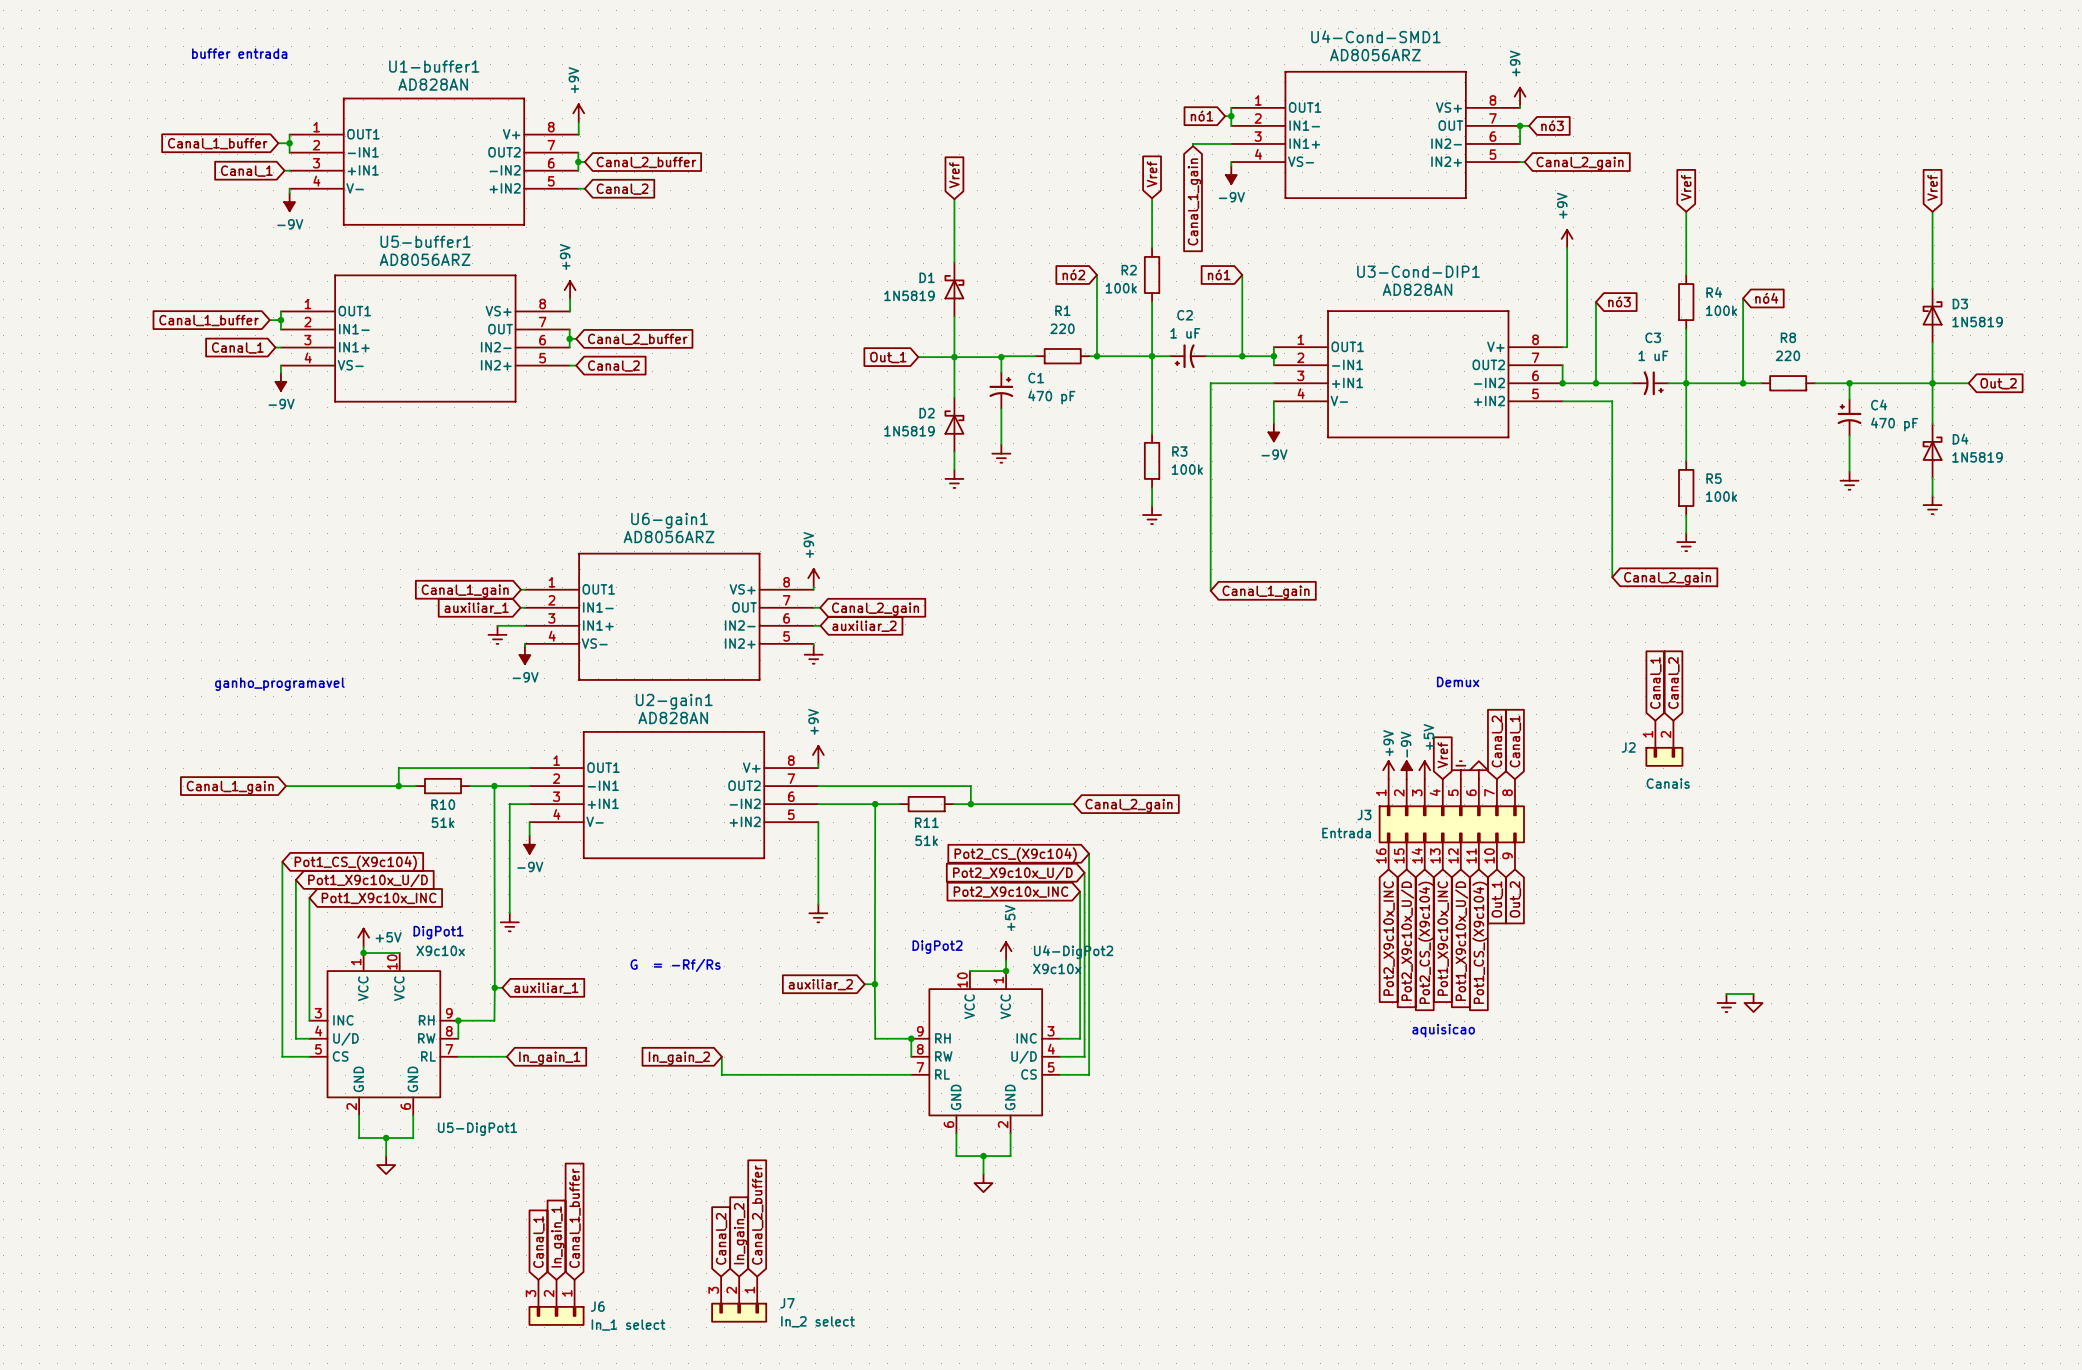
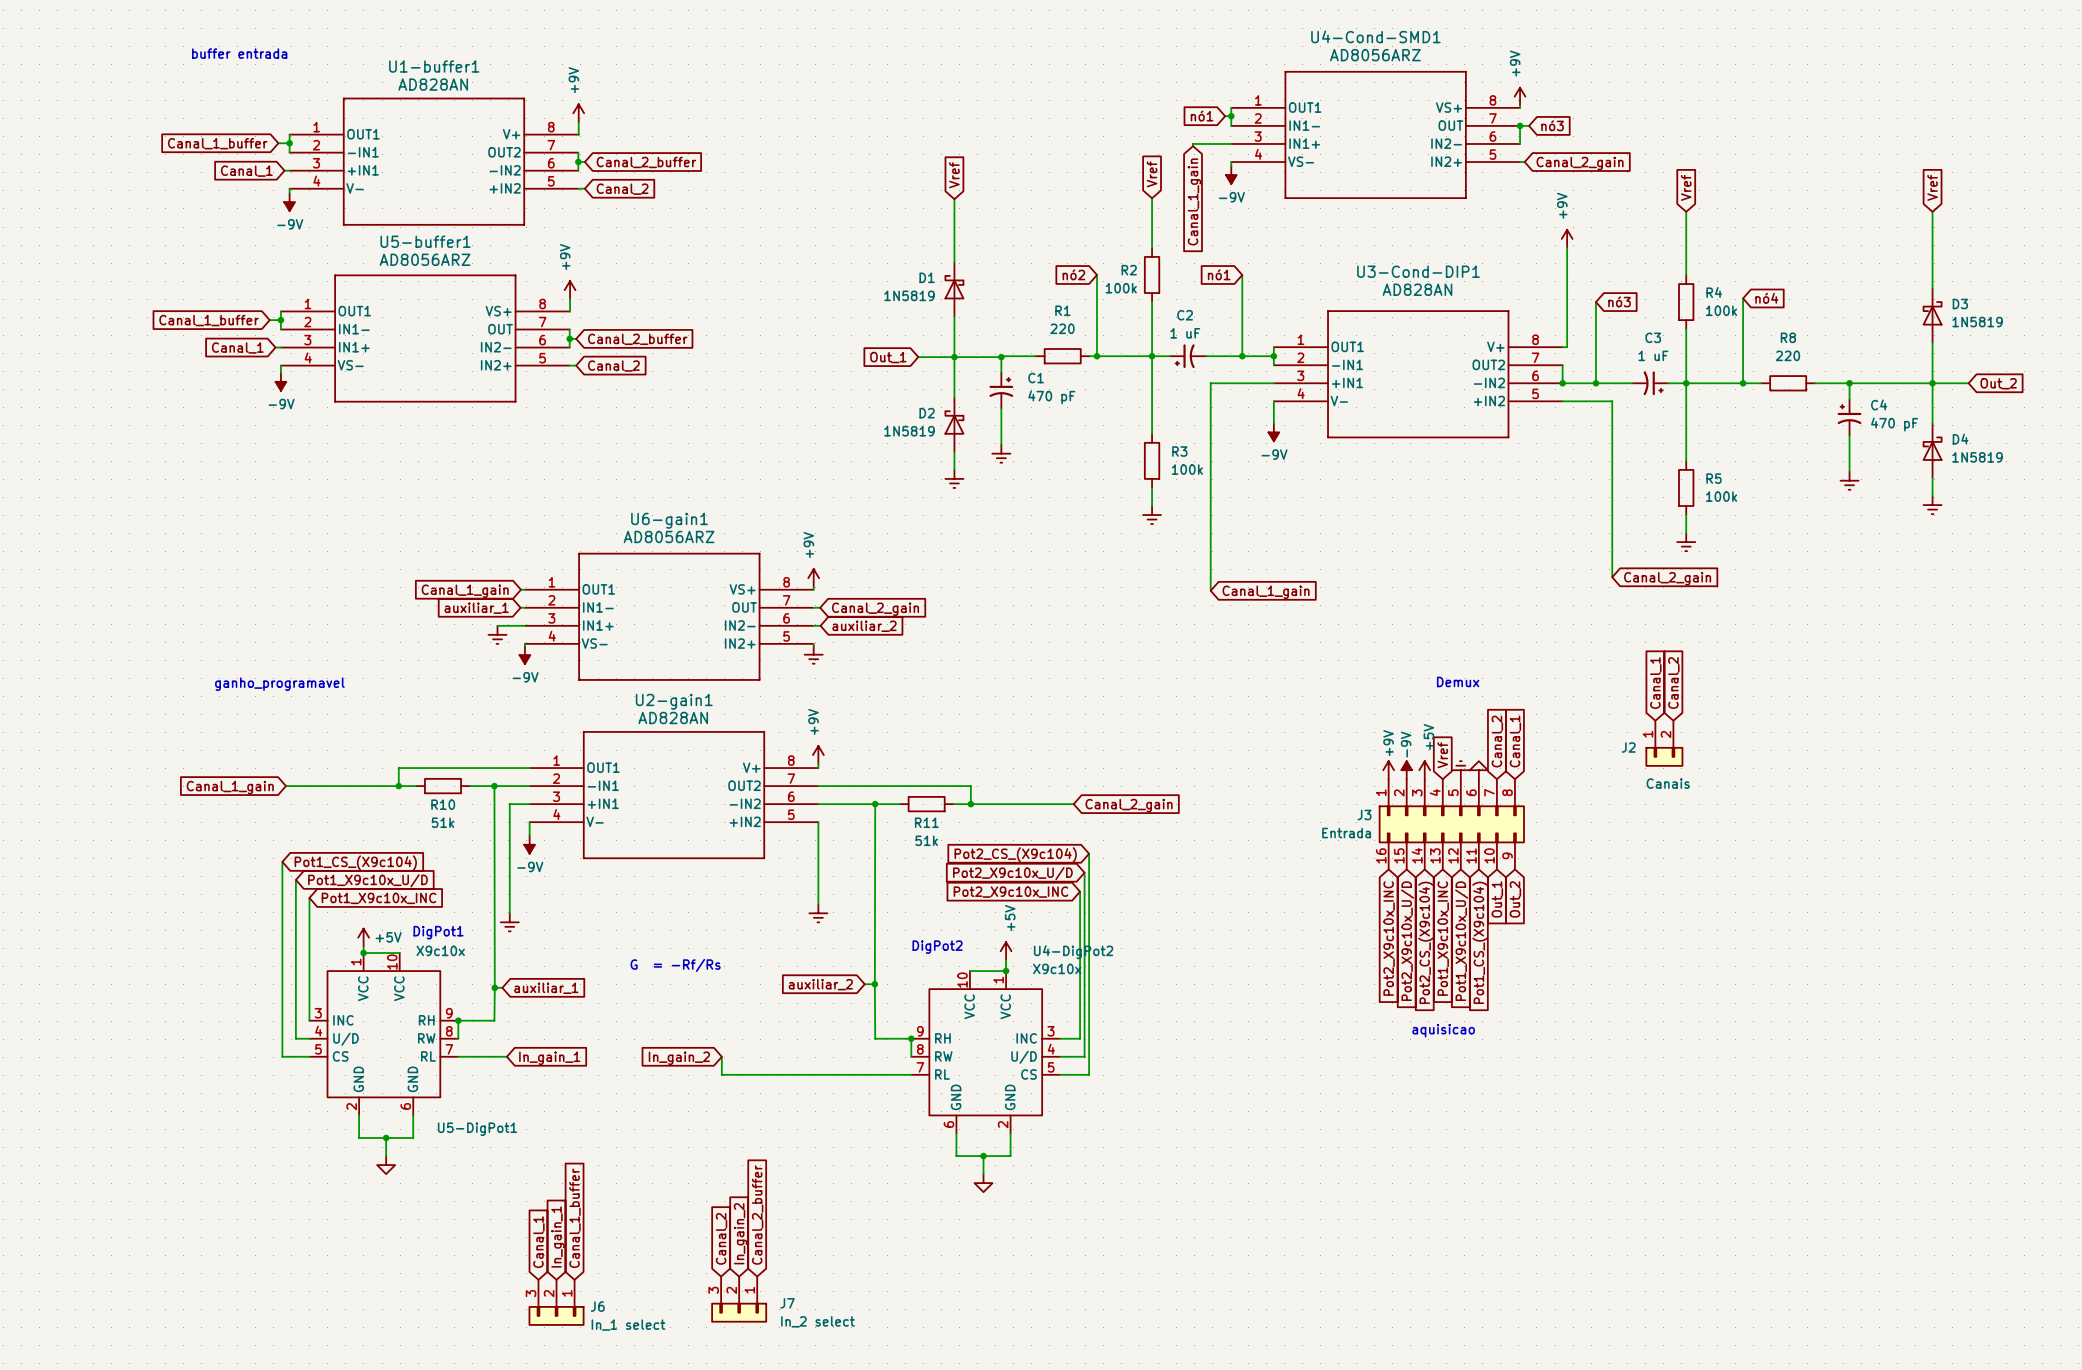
wire: (1726, 993) (1753, 993) -> none
power symbol: (1726, 1003) -> none
power symbol: (1753, 1003) -> none

